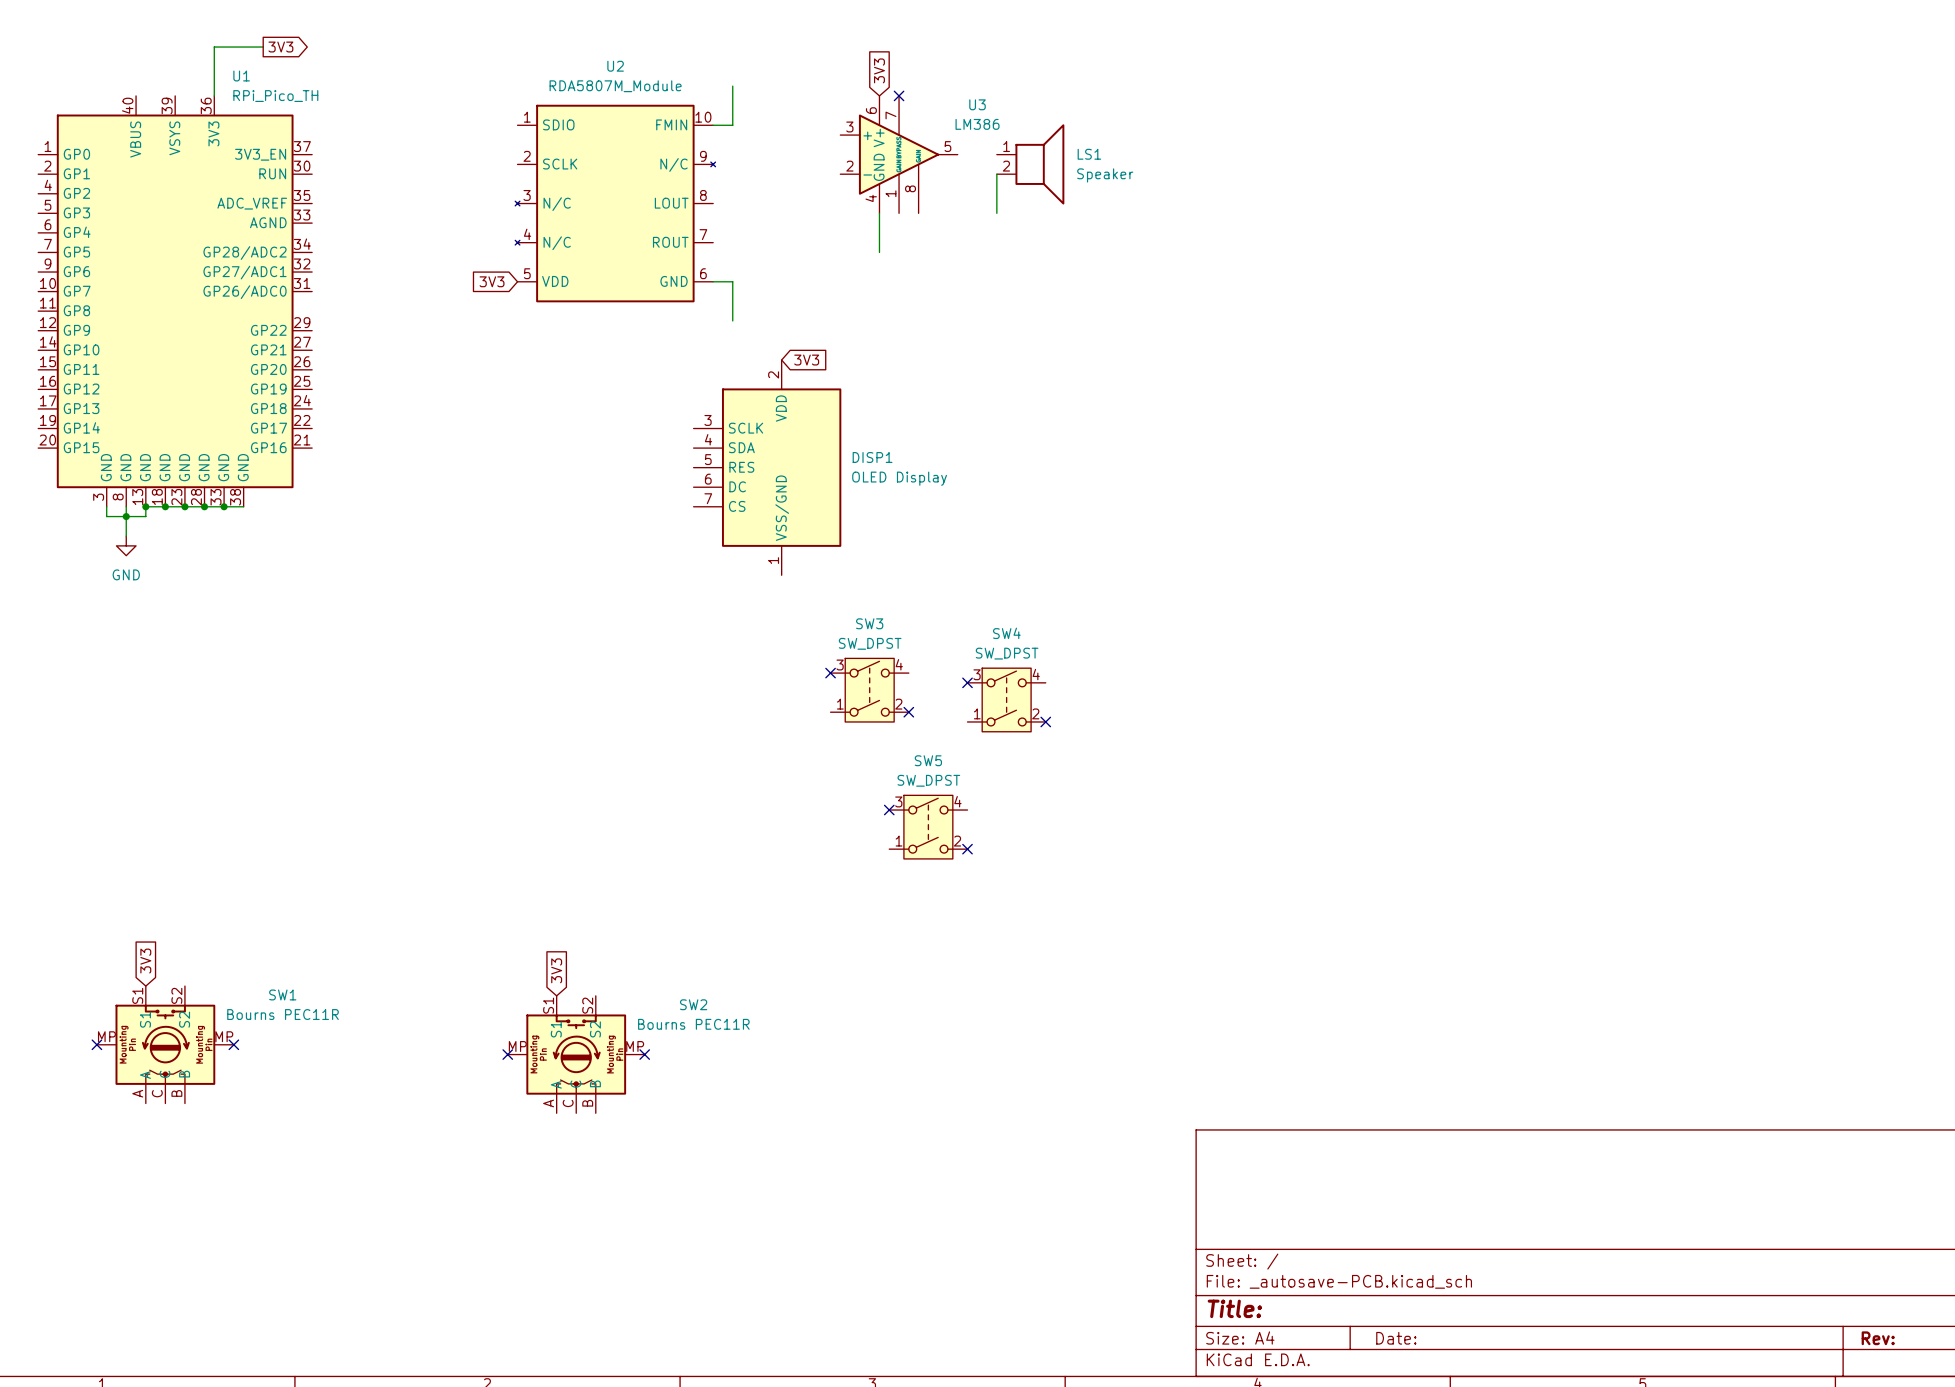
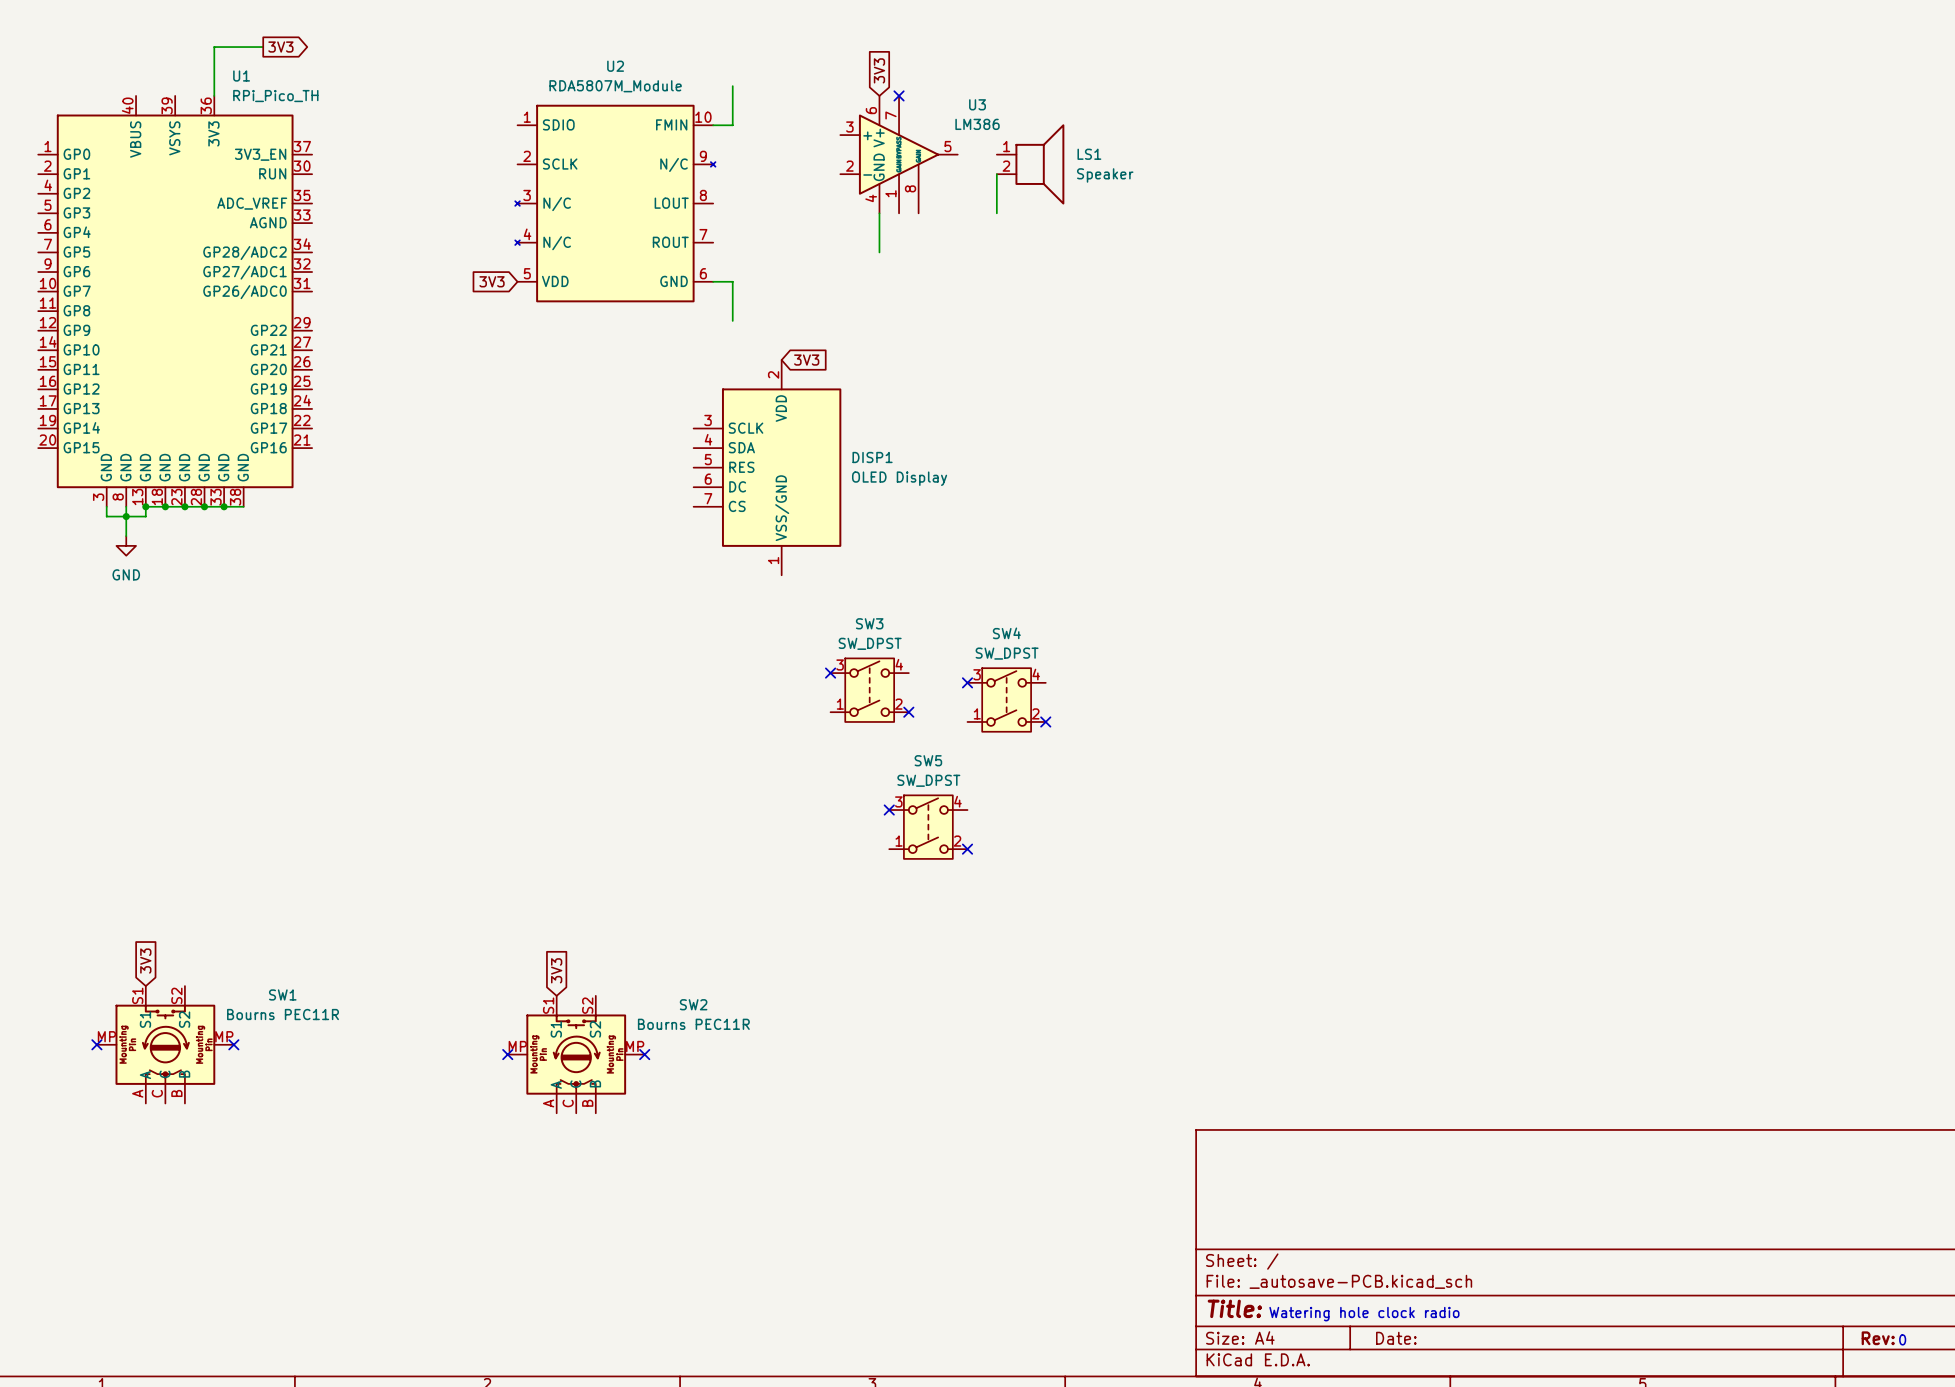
text: none -> Watering hole clock radio (1364, 1314)
text: none -> 0 (1902, 1339)

